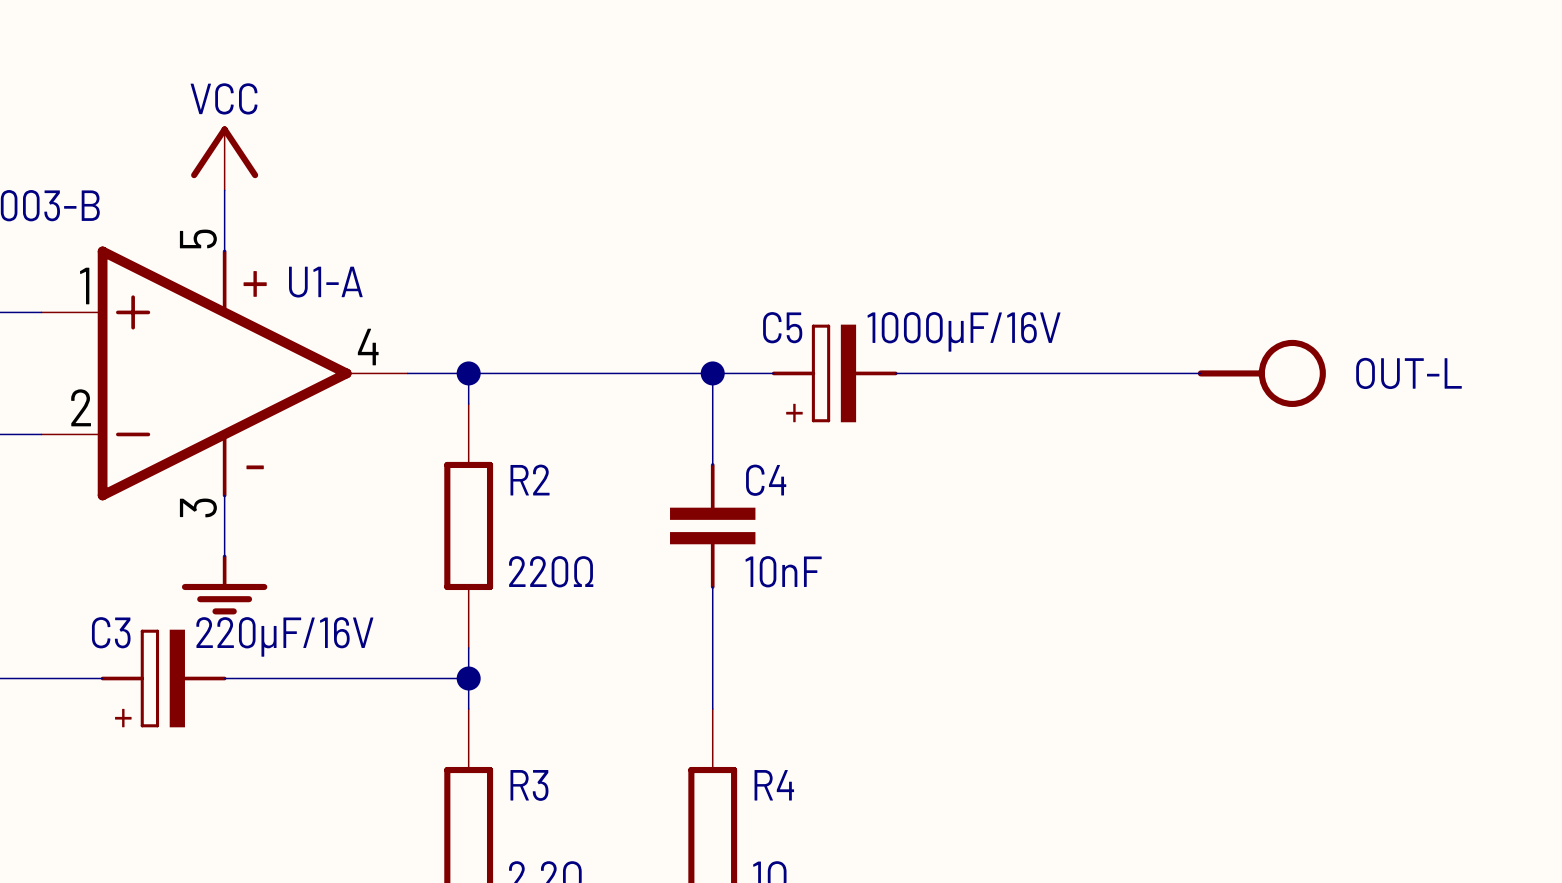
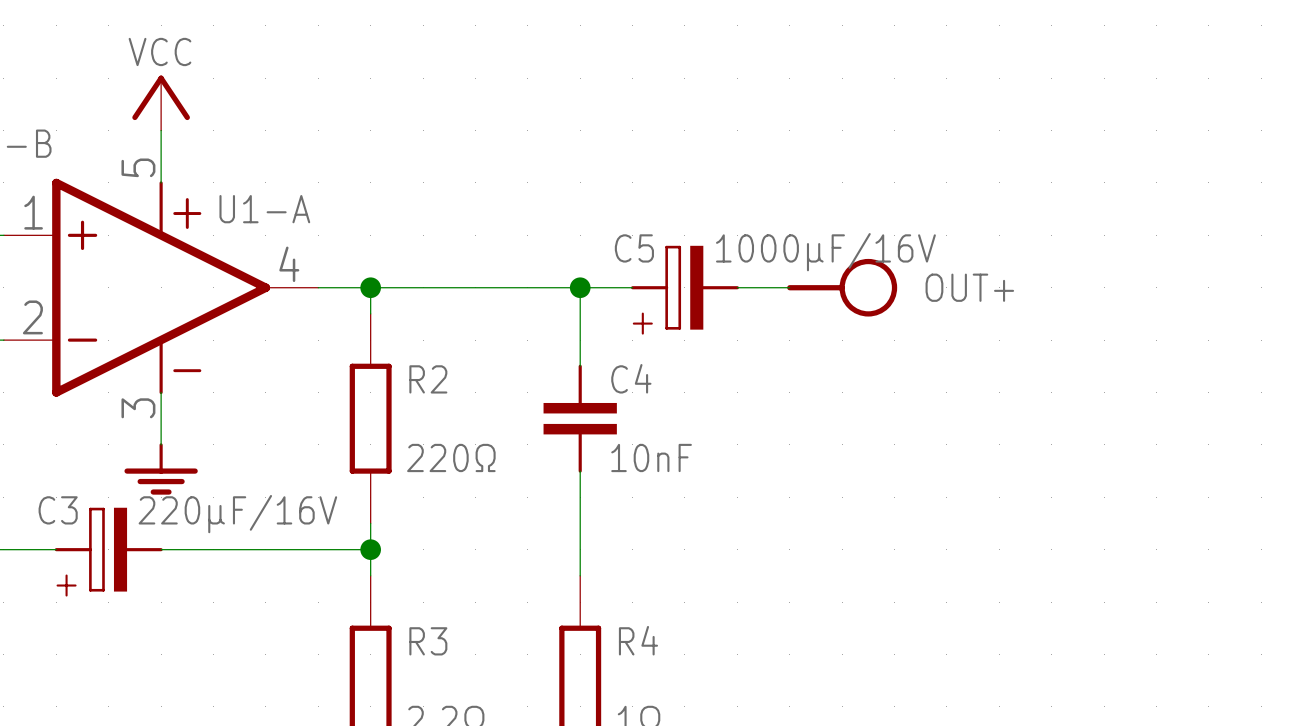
wire: (956, 373) (1200, 373) -> none
OUT+: none -> (842, 287)
OUT-L: (1261, 373) -> none

